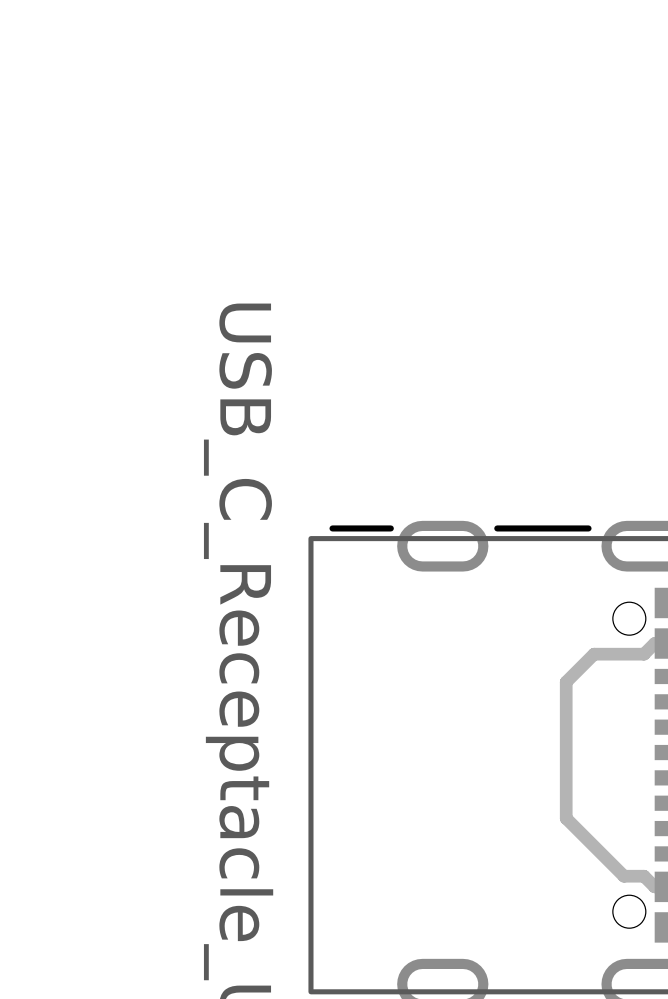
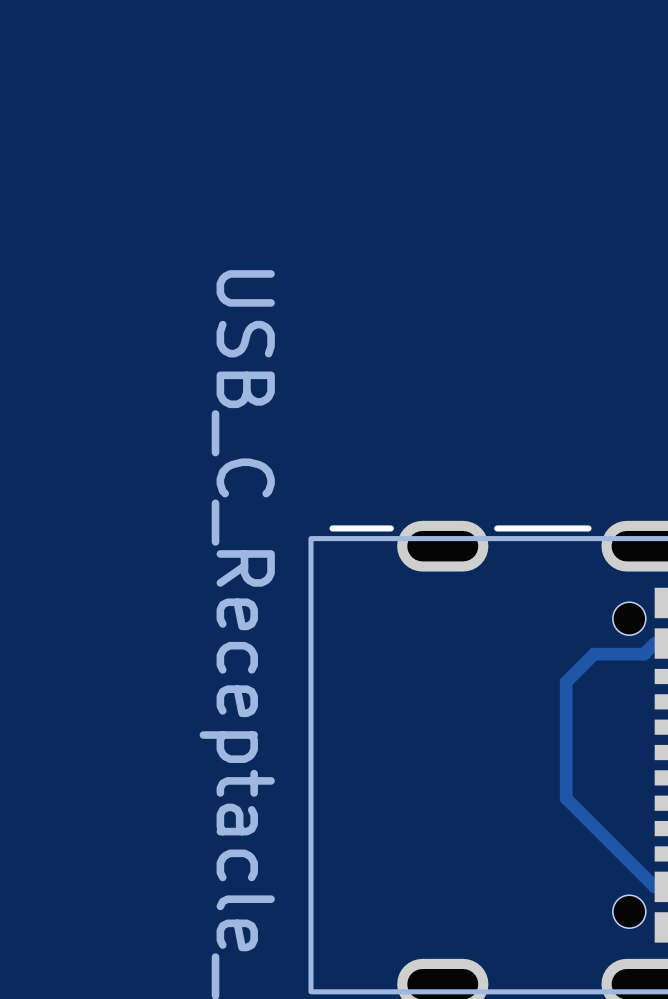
track: (566, 798) (566, 818) (624, 876) (644, 876) -> (566, 798) (644, 876)

